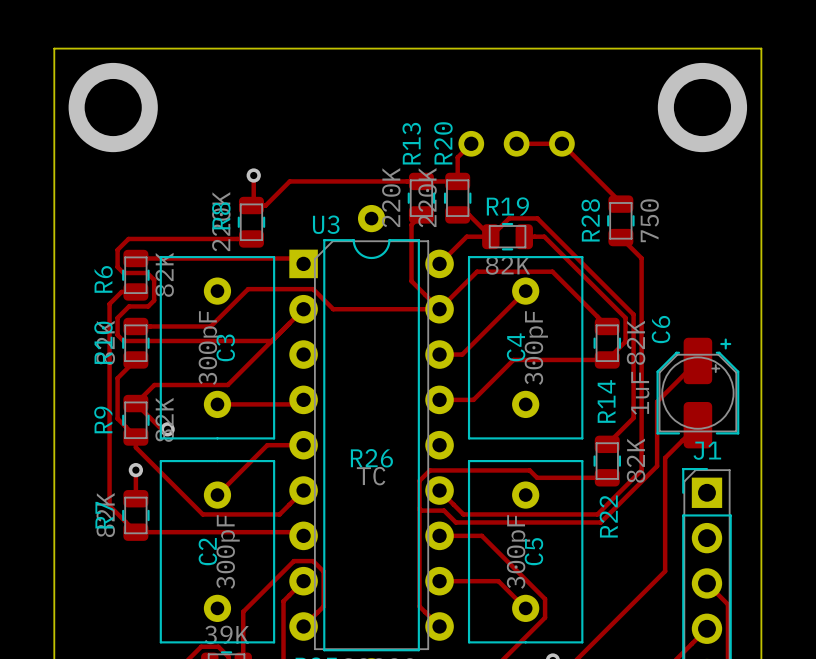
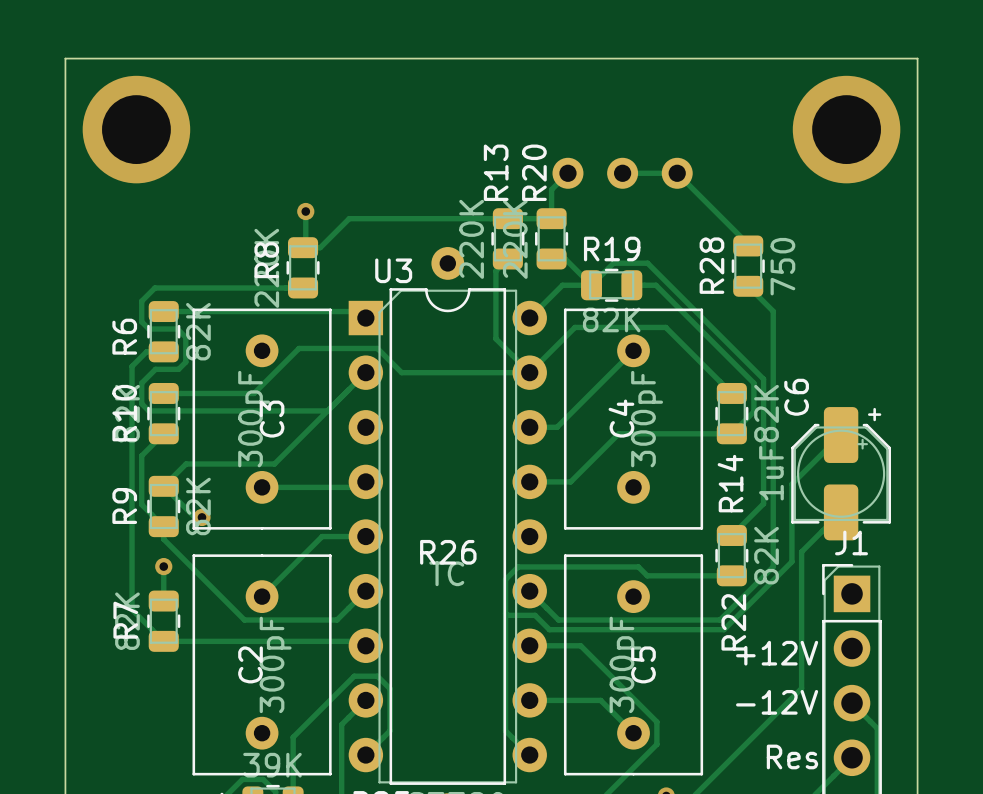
text: none -> +12V (777, 653)
text: none -> -12V (777, 702)
text: none -> Res (792, 756)

